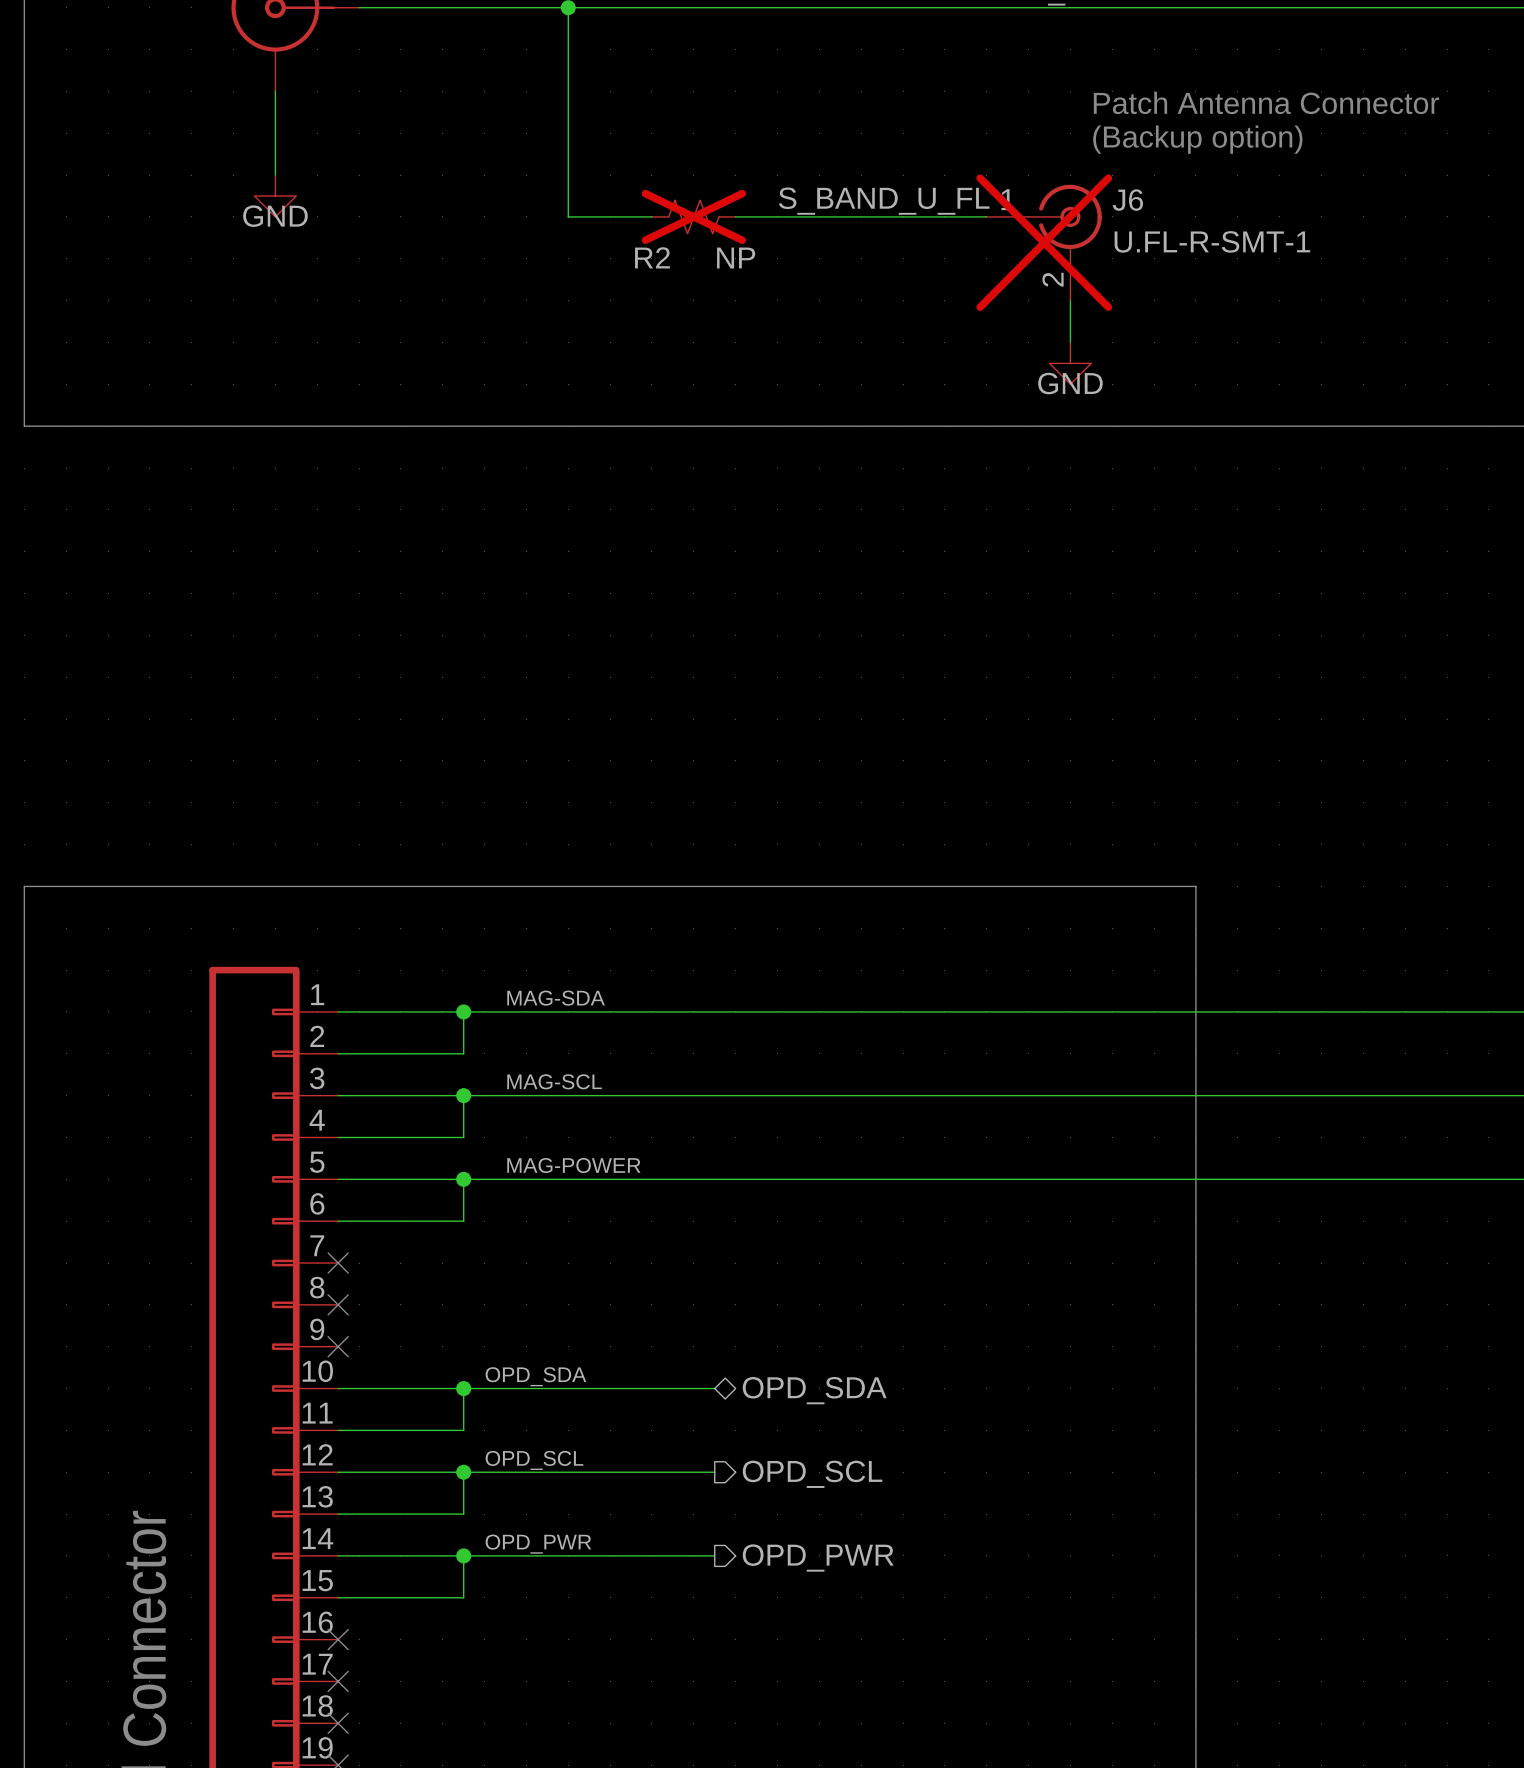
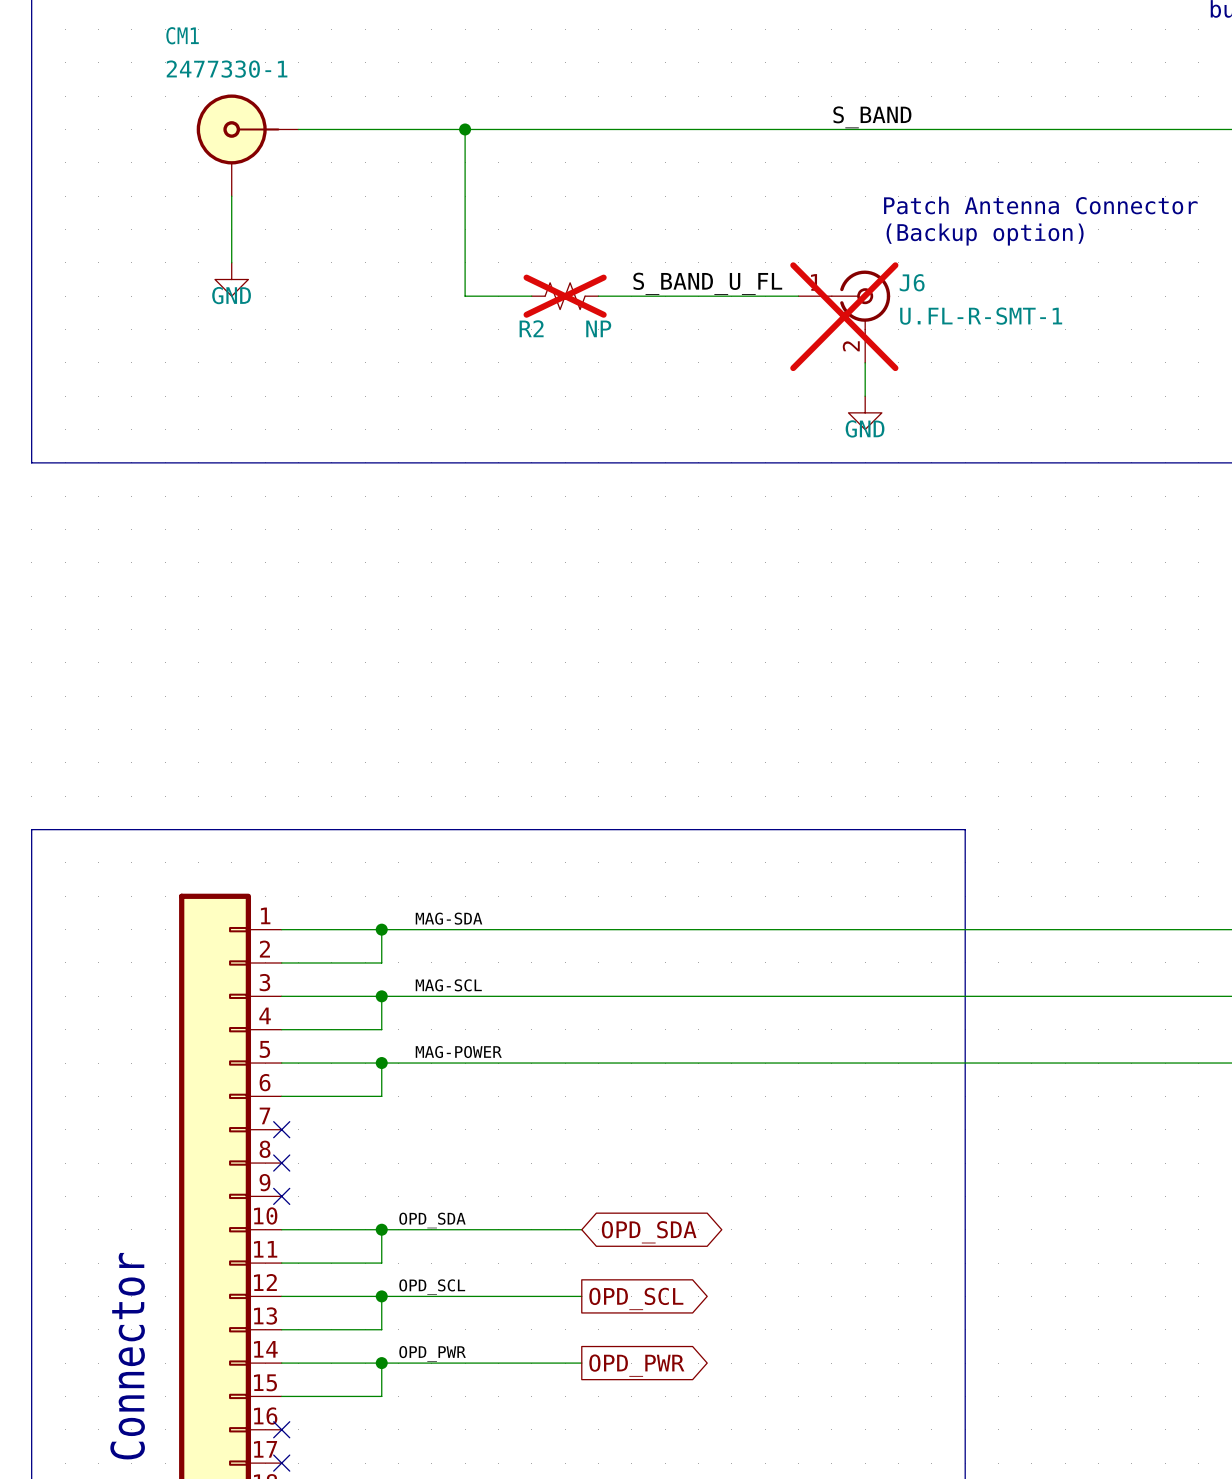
hierarchical label: OPD_SDA (814, 1390) -> none
global label: none -> OPD_SDA (649, 1232)
hierarchical label: OPD_SCL (812, 1474) -> none
global label: none -> OPD_SCL (636, 1298)
global label: none -> OPD_PWR (636, 1365)
hierarchical label: OPD_PWR (818, 1558) -> none

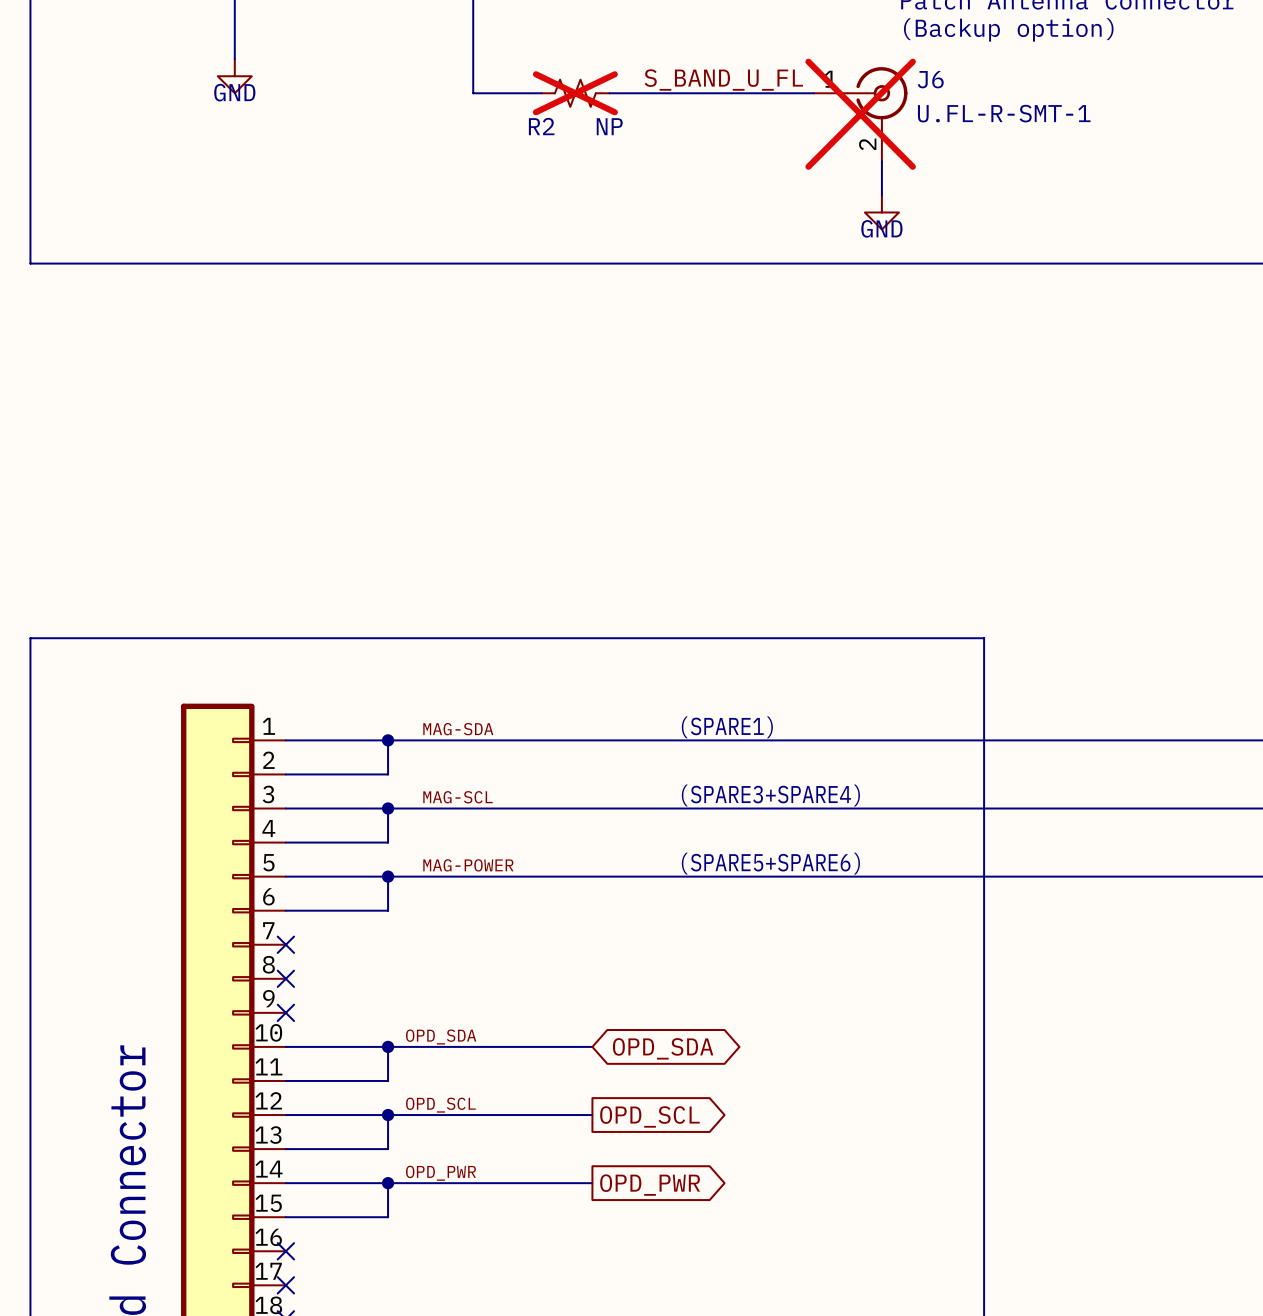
text: none -> (SPARE1) (727, 727)
text: none -> (SPARE3+SPARE4) (770, 795)
text: none -> (SPARE5+SPARE6) (770, 863)

